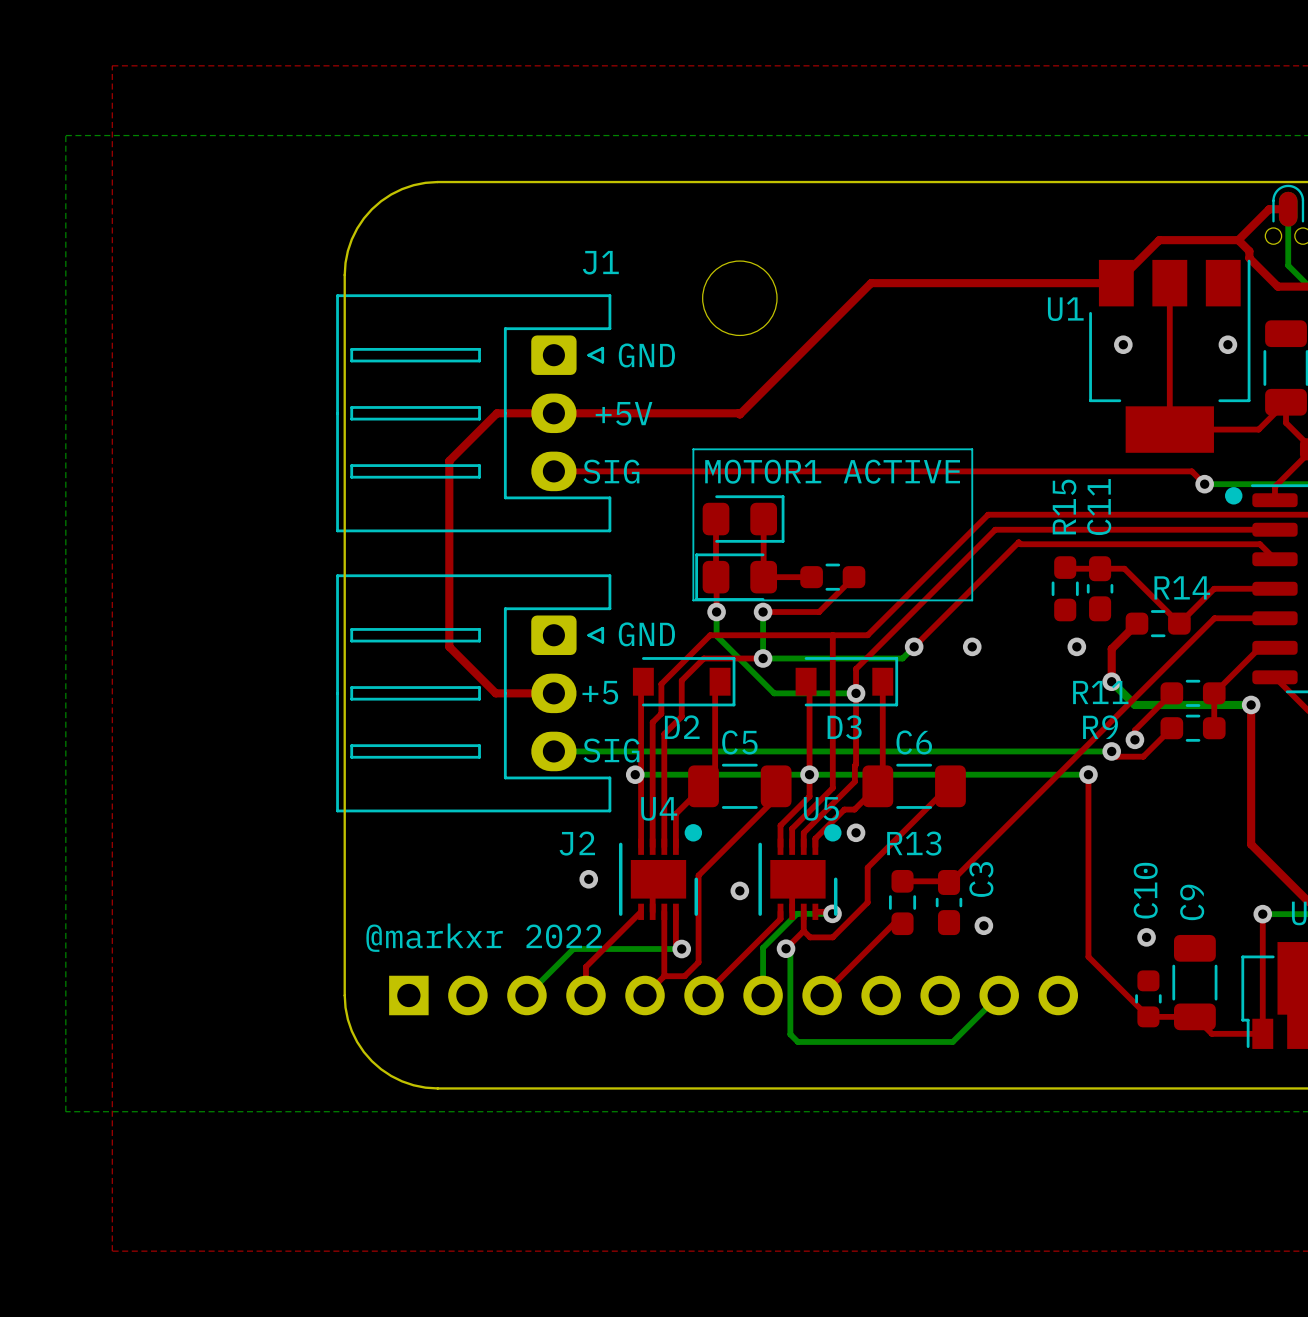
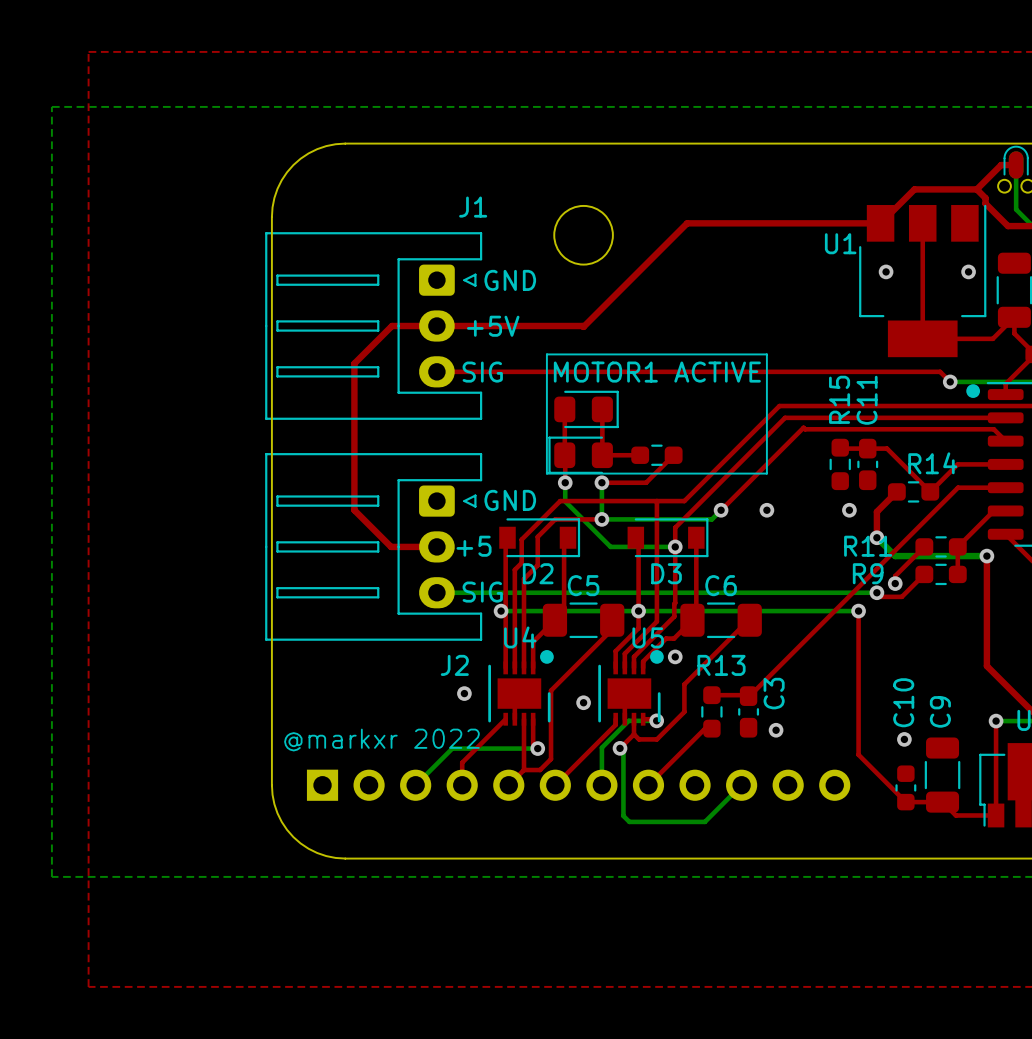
bottom track: (999, 995) (952, 1041) (893, 1041) -> (741, 785) (704, 821)

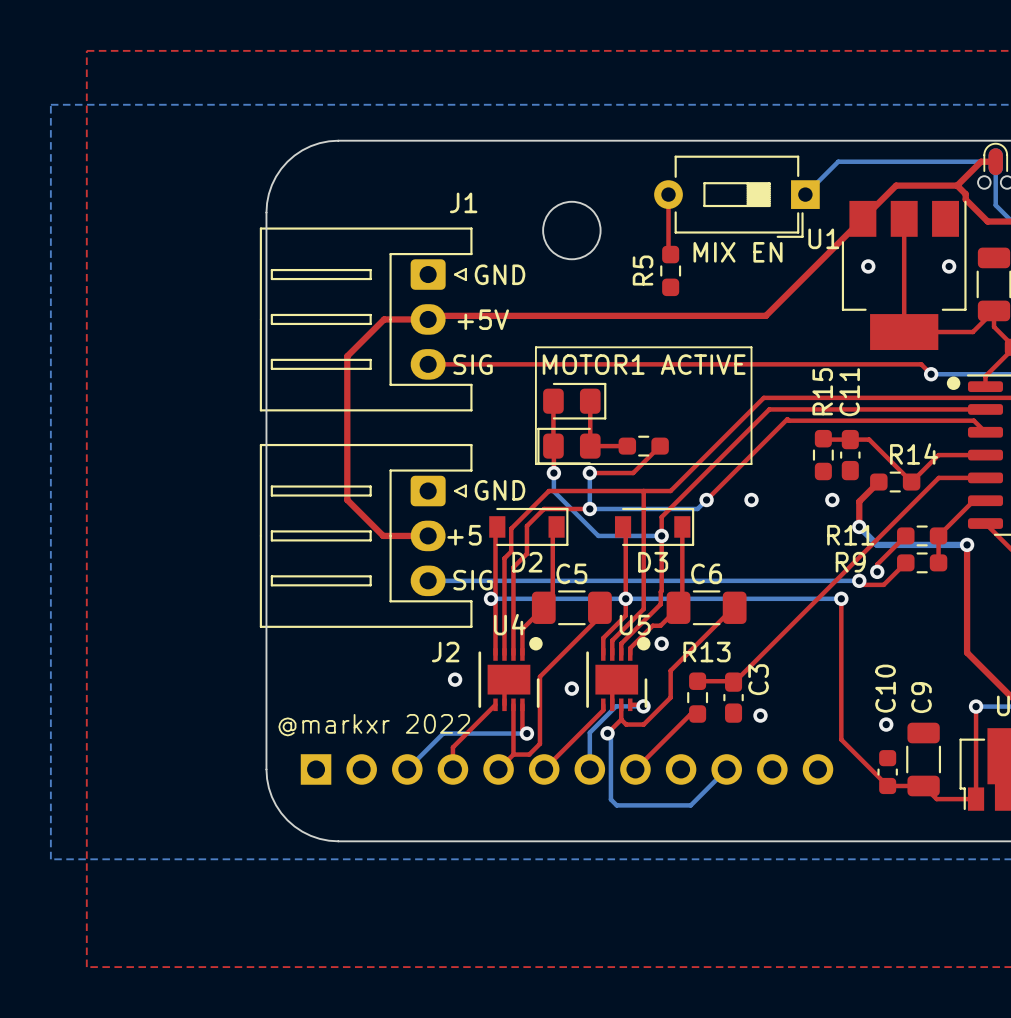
bottom track: none -> (995, 161) (838, 161) (805, 194)
top track: none -> (668, 194) (668, 252) (670, 254)
part: none -> (736, 196)
top track: (880, 223) (687, 223) (583, 326) (436, 326) -> (862, 218) (765, 315) (431, 315) (428, 319)
text: none -> MIX EN (738, 252)
R5: none -> (670, 270)

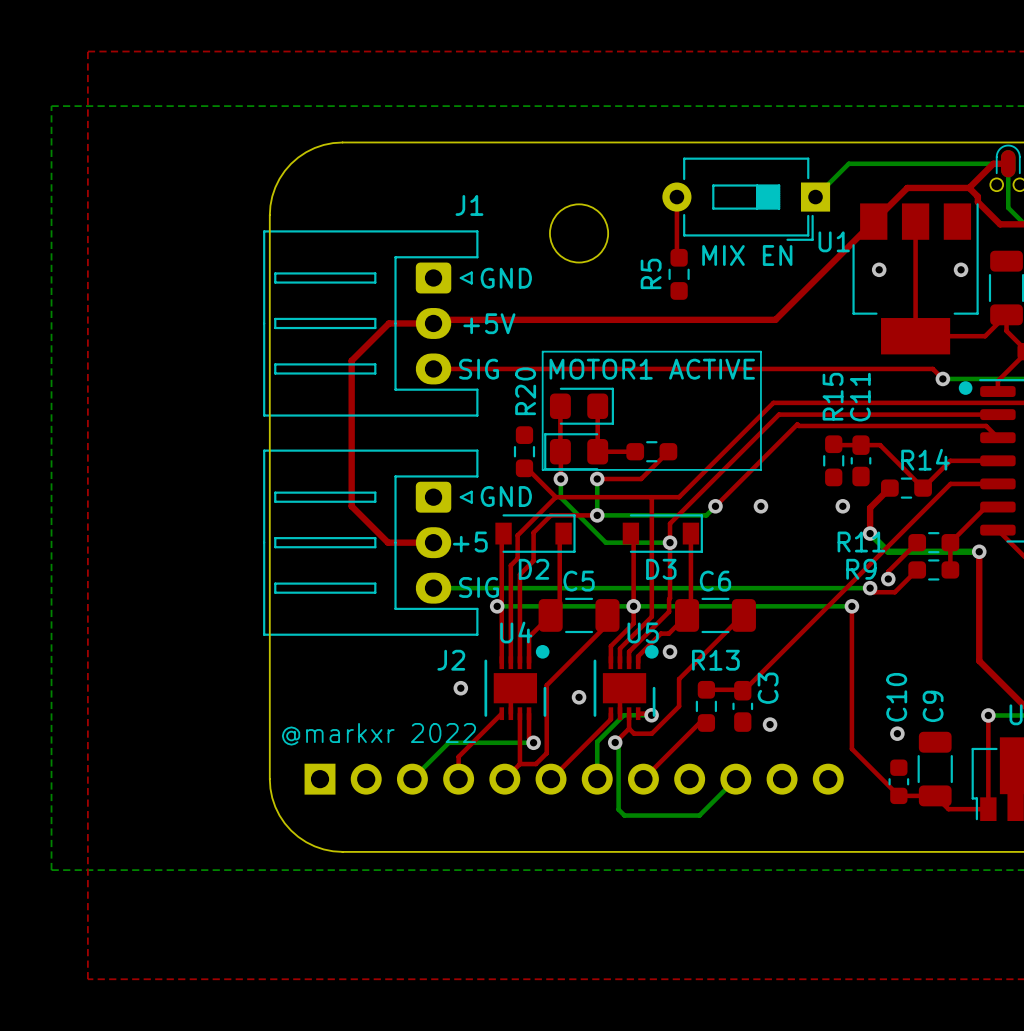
R20: none -> (524, 451)
top track: none -> (524, 468) (526, 468) (555, 497)

